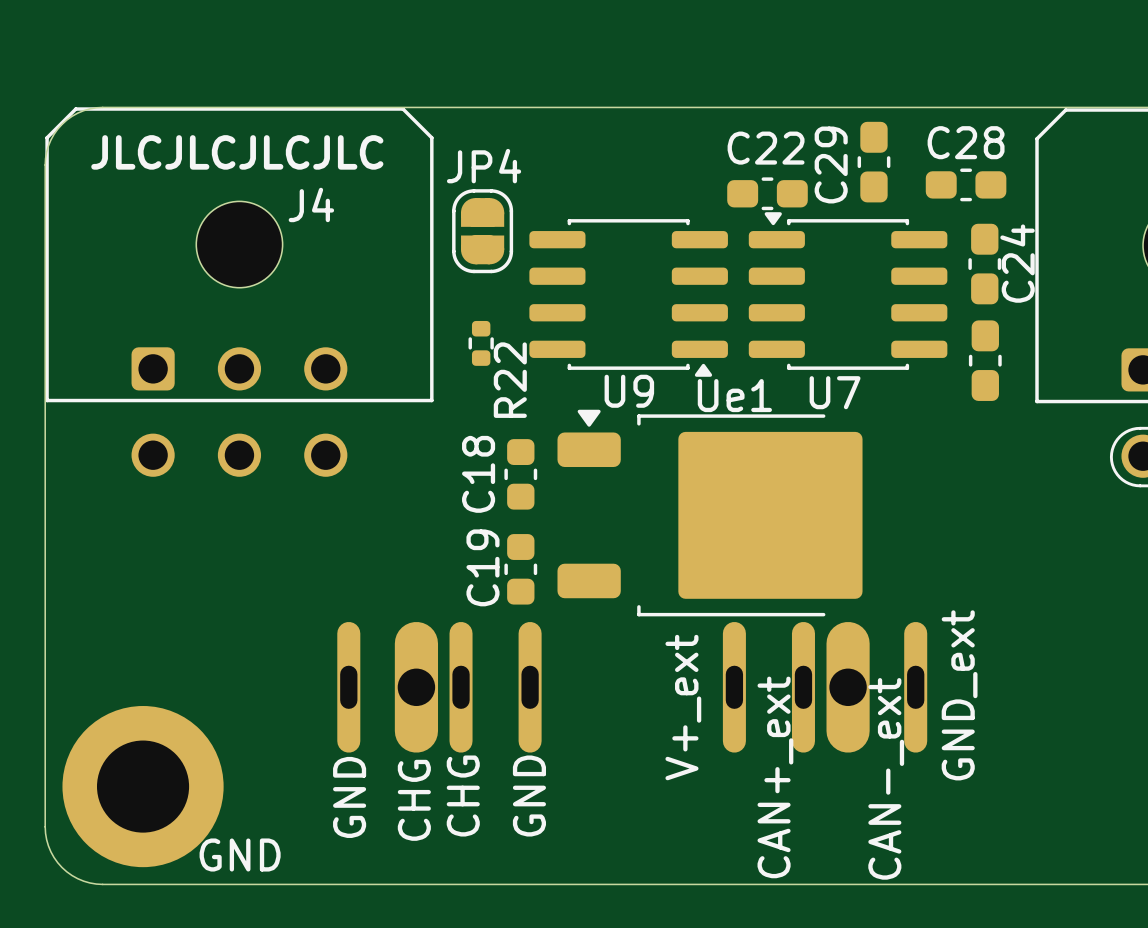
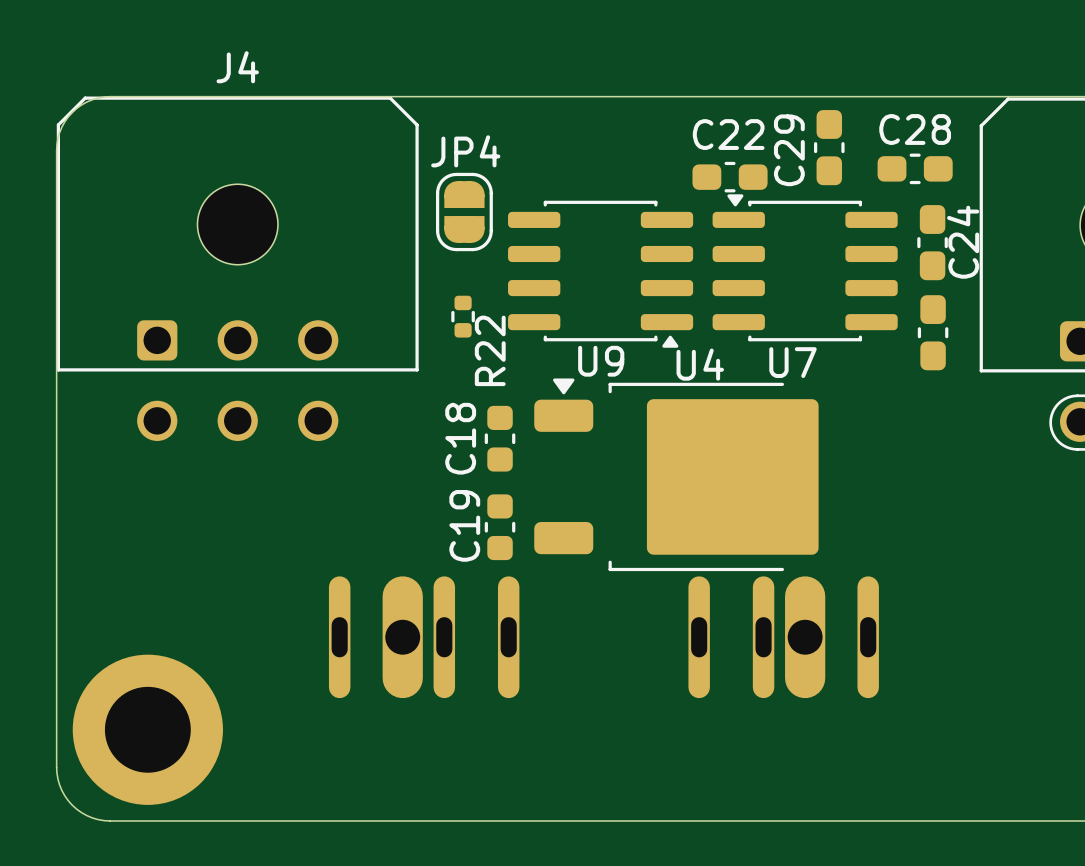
text: JLCJLCJLCJLC (237, 152) -> none
J4 name position: J4 (311, 204) -> J4 (237, 67)
Ue1 name: Ue1 (734, 395) -> U4 (700, 364)
text: GND_ext (959, 695) -> none
text: V+_ext (683, 707) -> none
text: CAN+_ext (775, 777) -> none
text: CAN-_ext (886, 778) -> none
text: CHG (463, 796) -> none
text: GND (529, 796) -> none
text: GND (349, 797) -> none
text: CHG (414, 800) -> none
text: GND (240, 855) -> none

